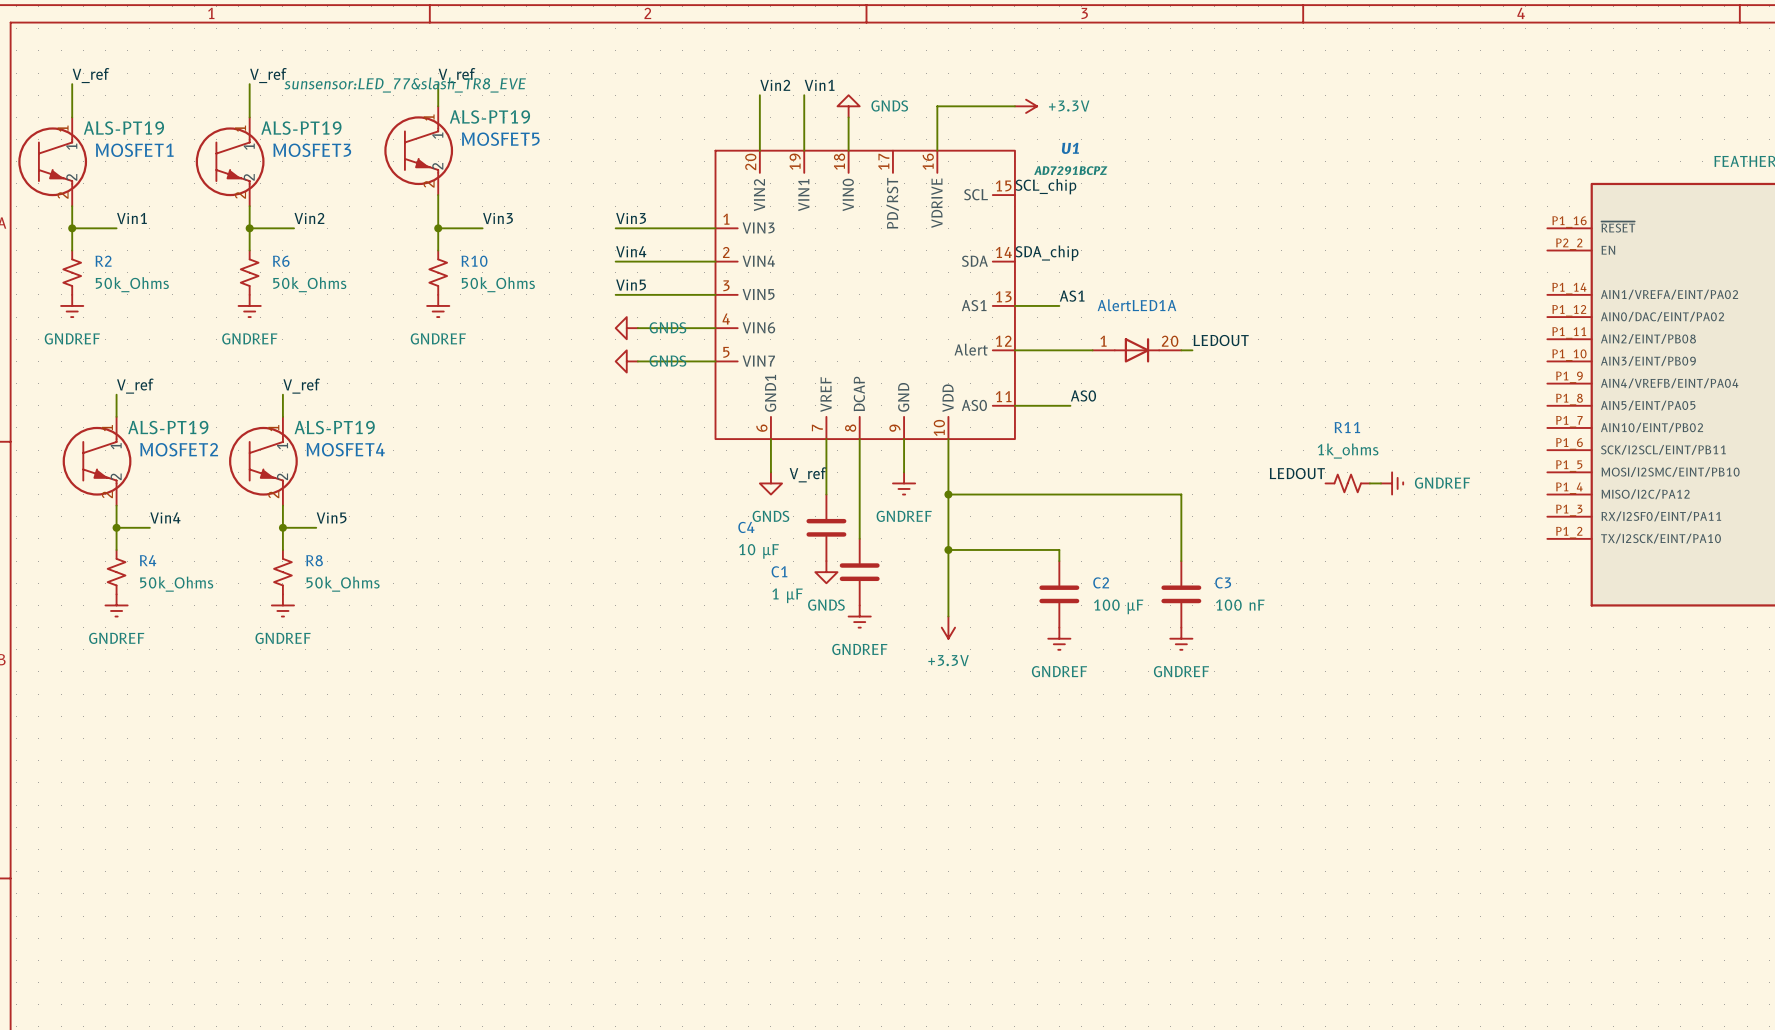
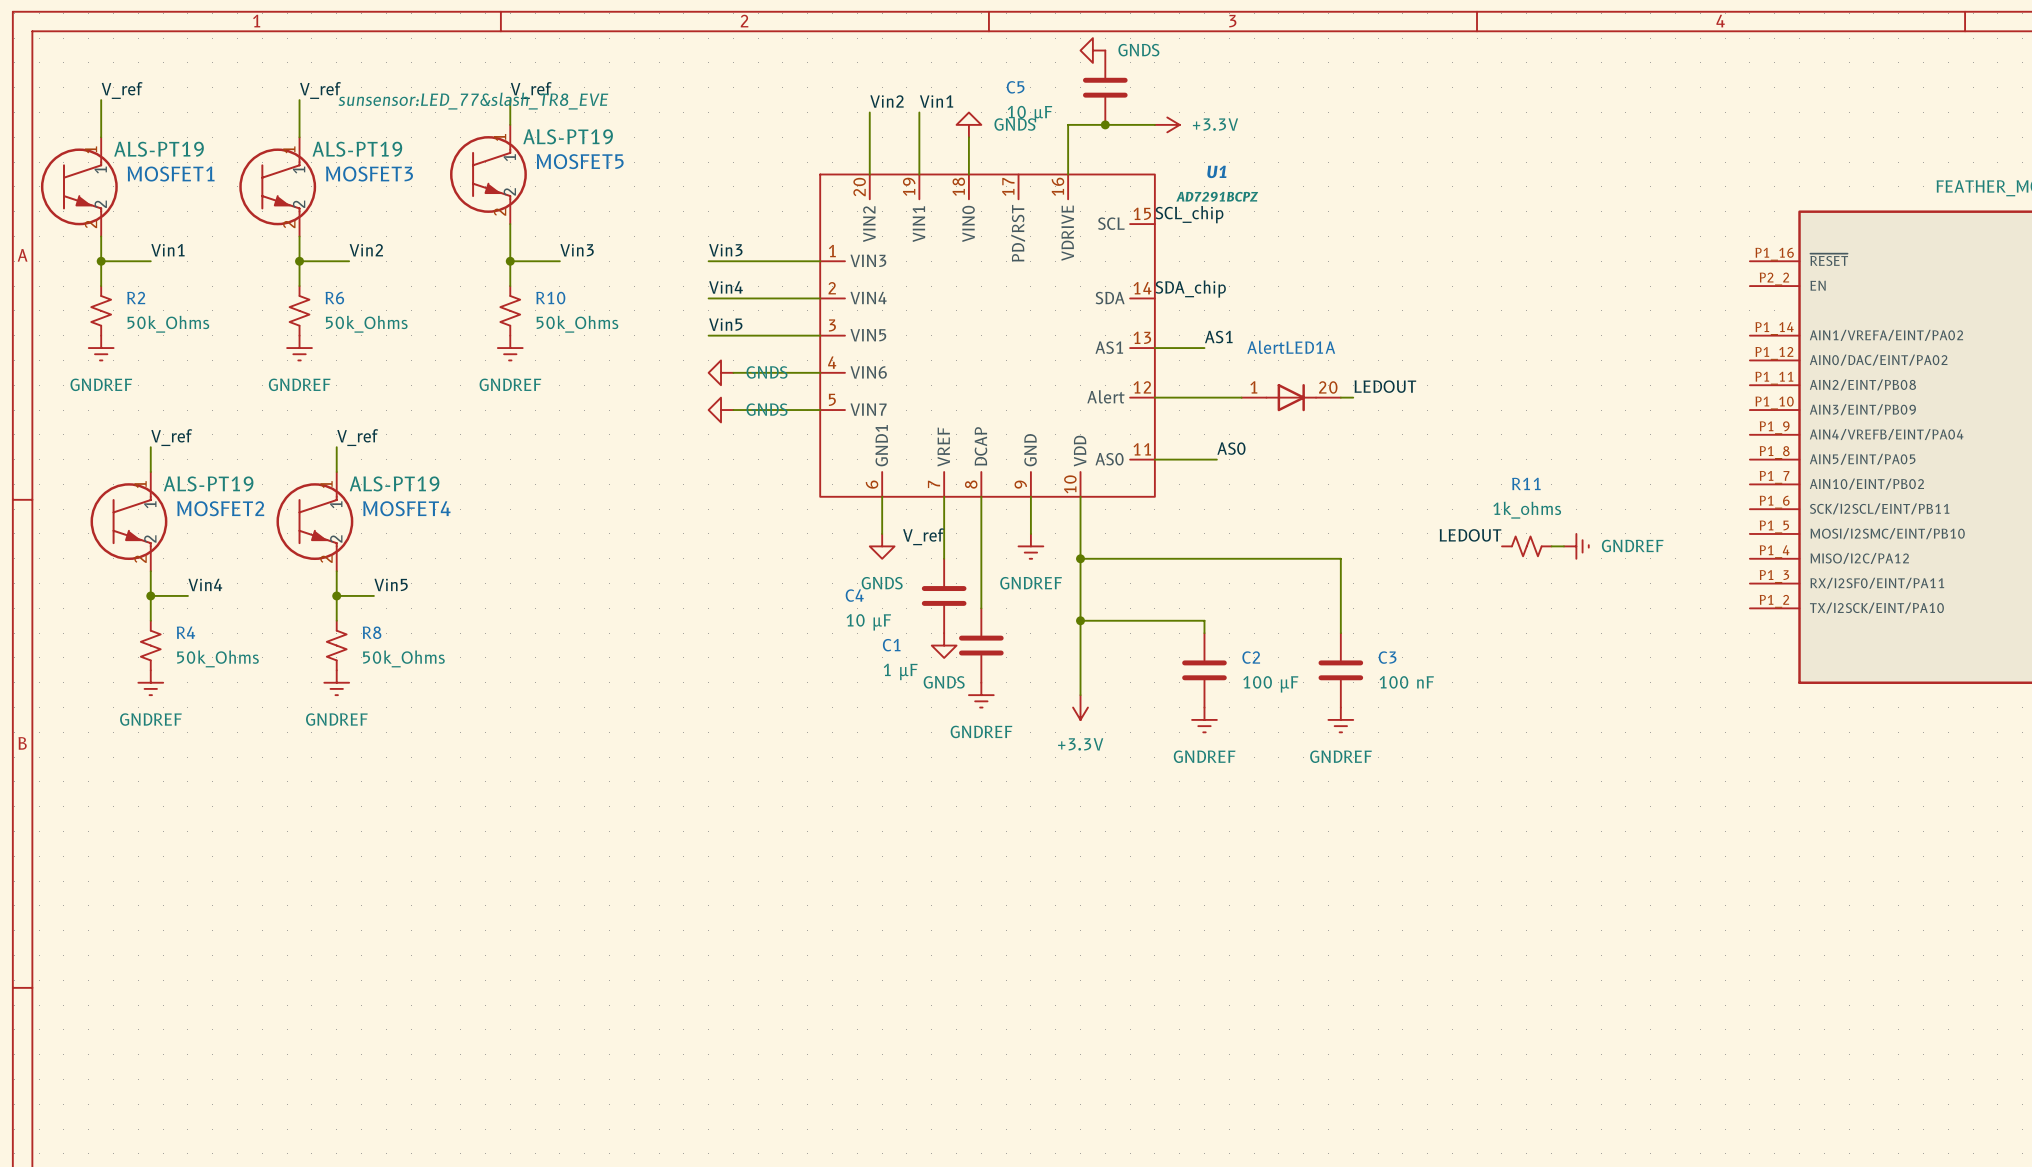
power symbol: none -> GNDS (1092, 50)
C5: none -> 10 µF (1105, 87)
junction: none -> (1105, 124)

